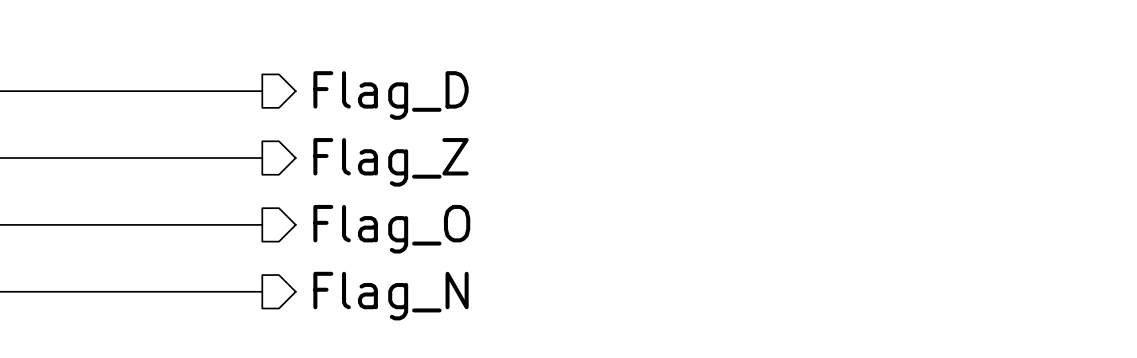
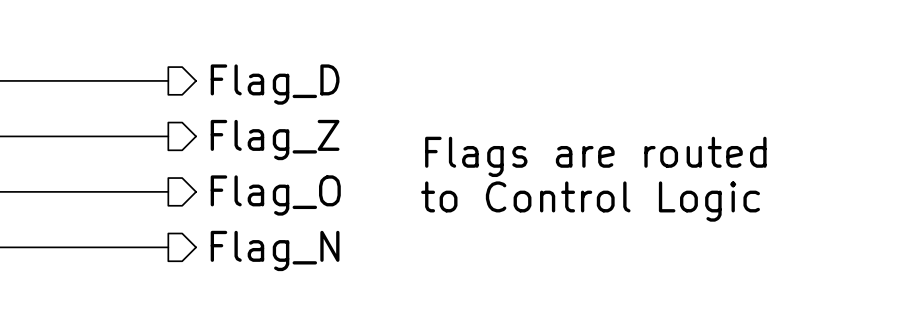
text: none -> Flags are routed (595, 156)
text: none -> to Control Logic (590, 201)

